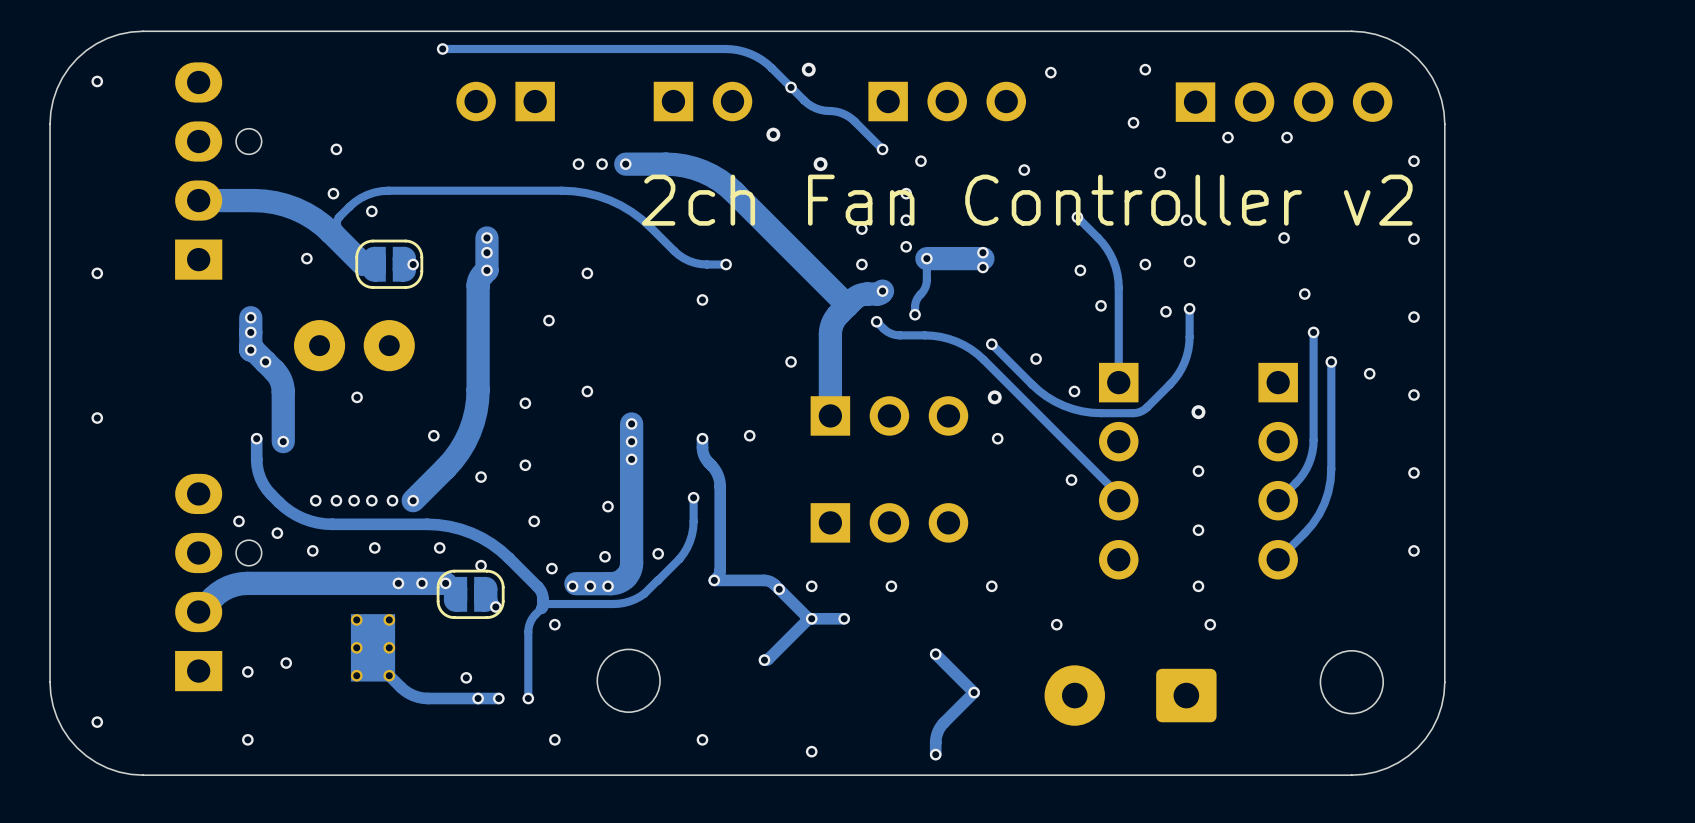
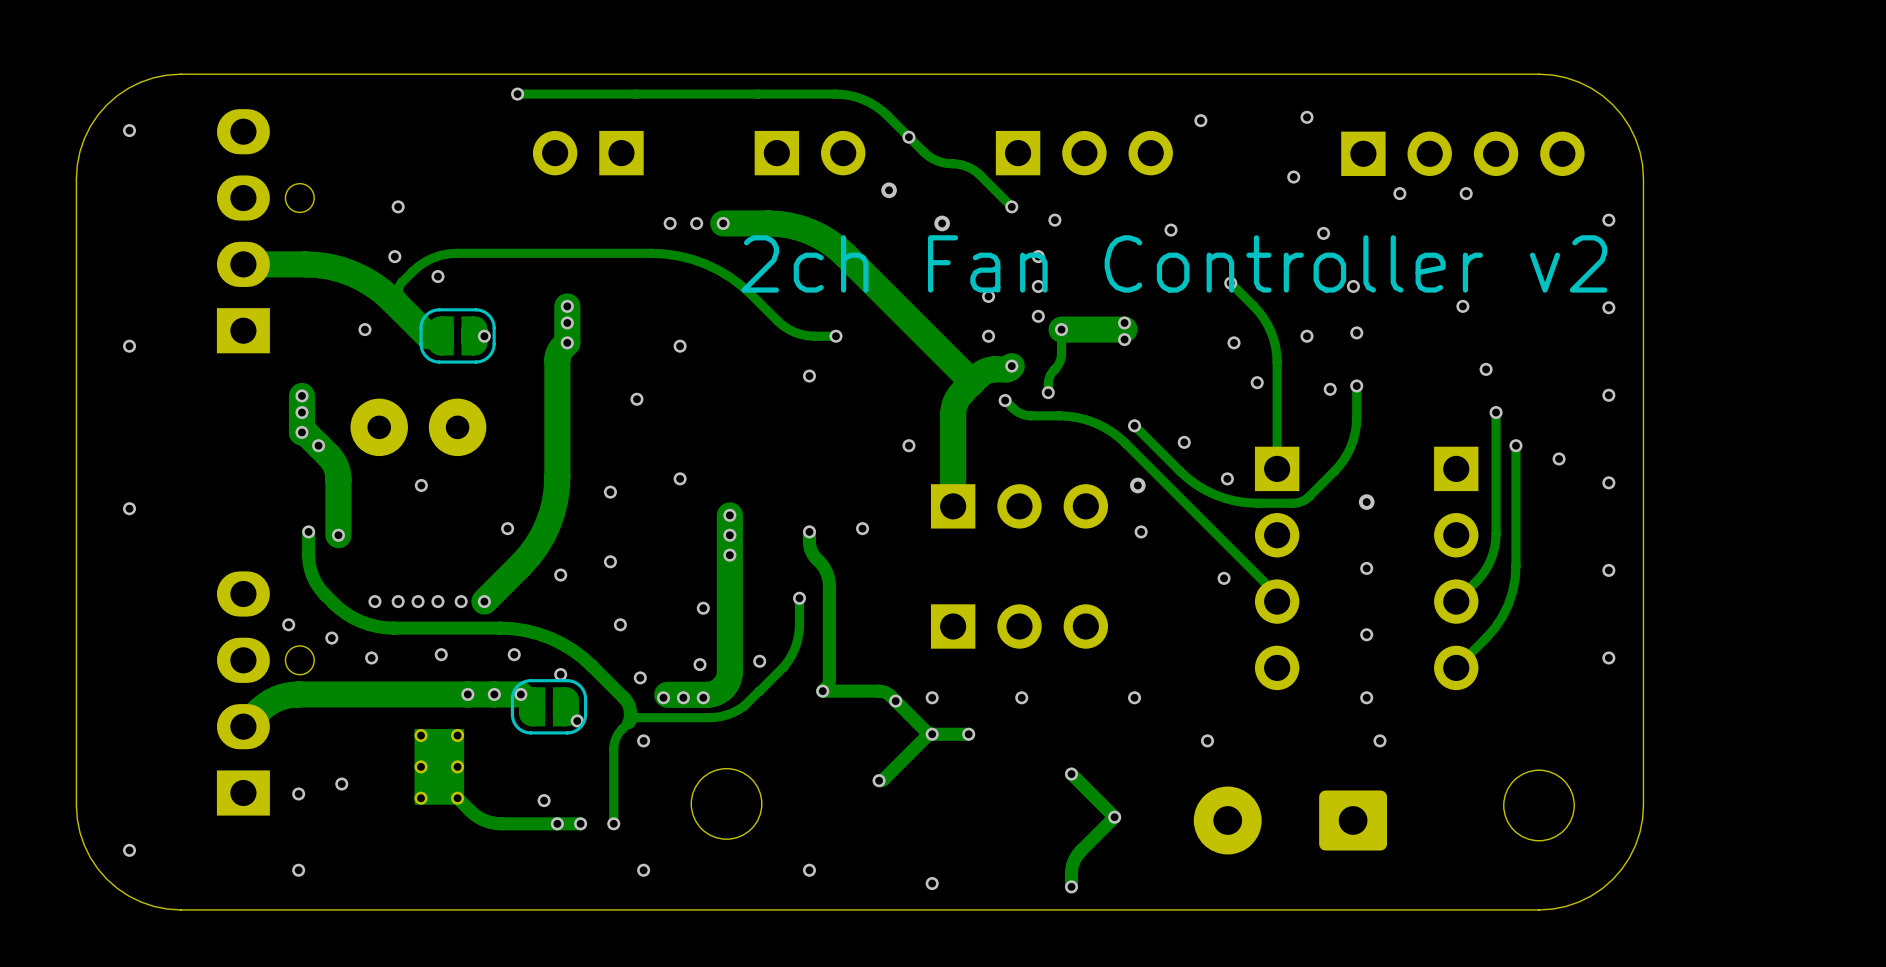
via: (808, 69) -> none

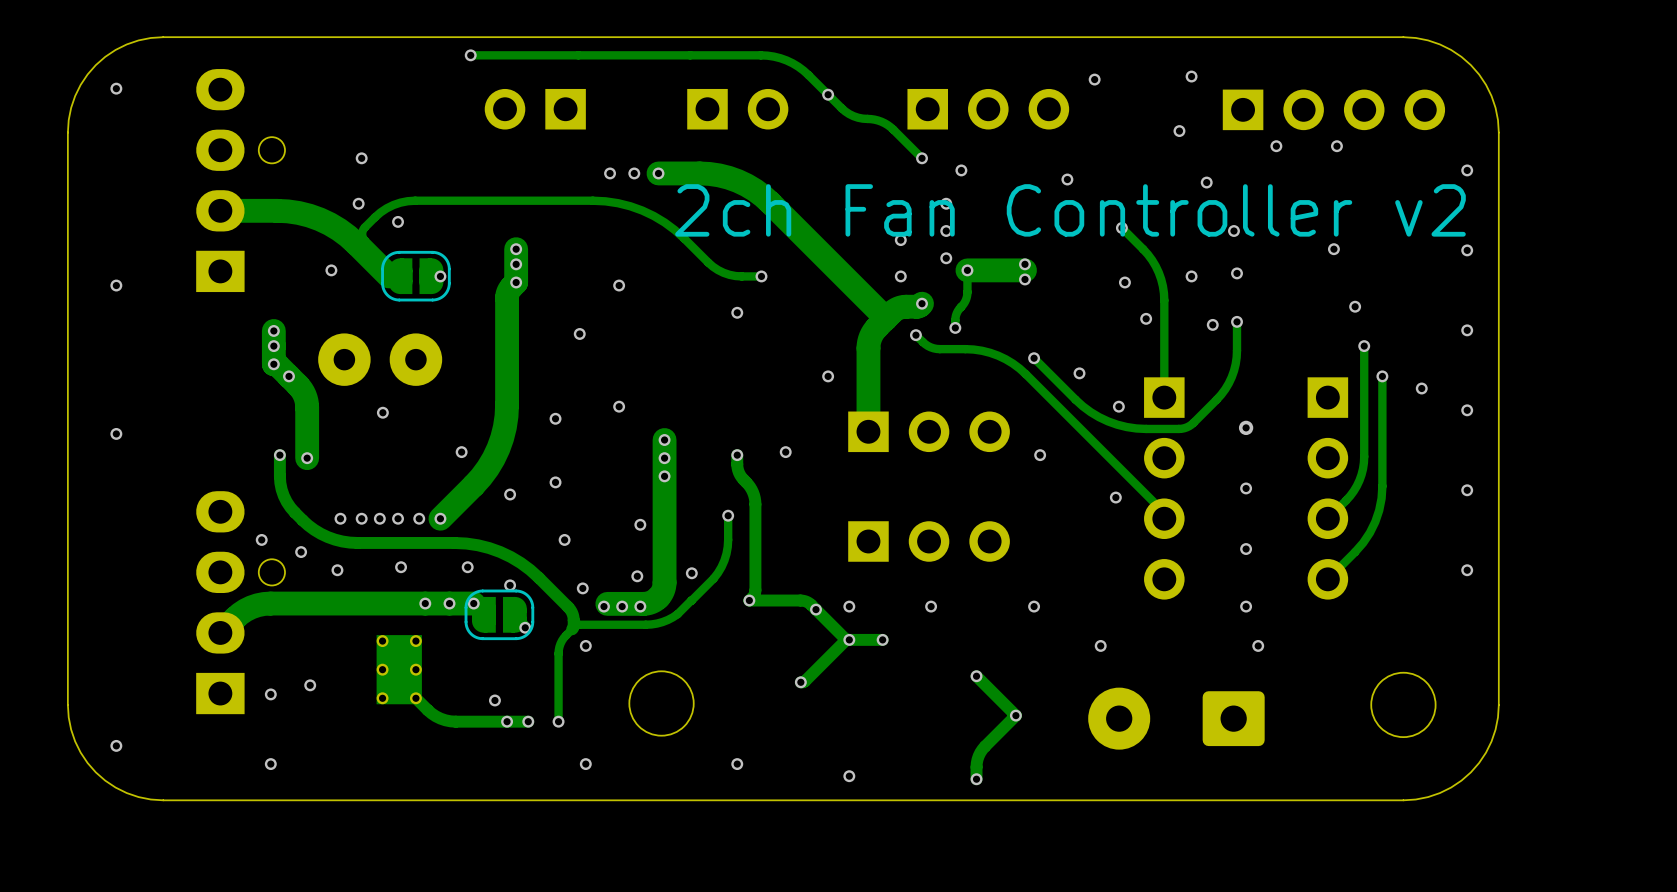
via: (889, 190) -> none
via: (942, 223) -> none
via: (1137, 485) -> none

